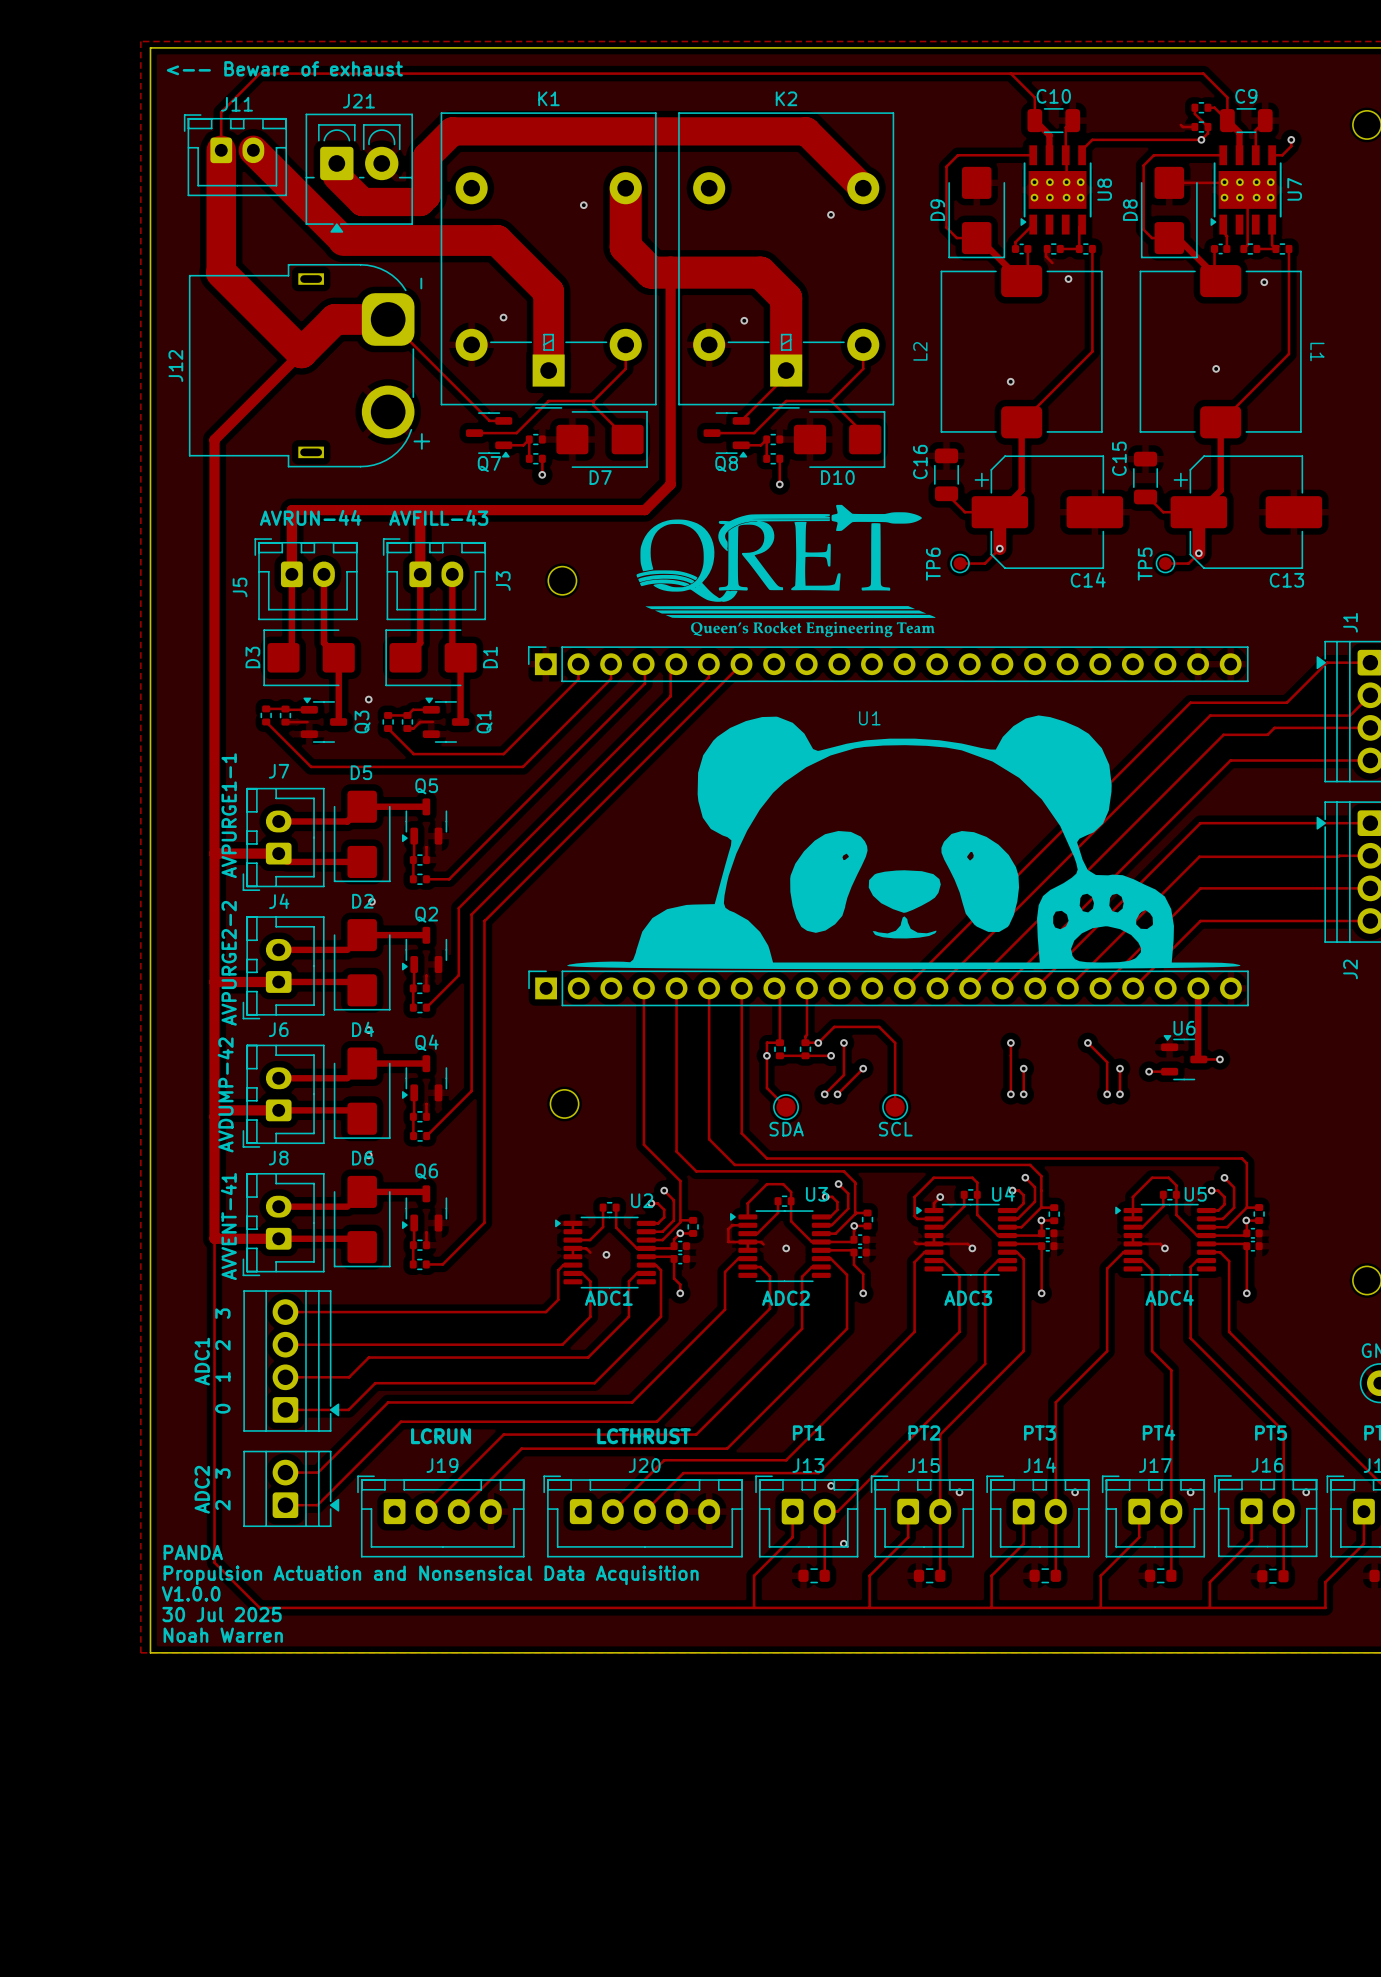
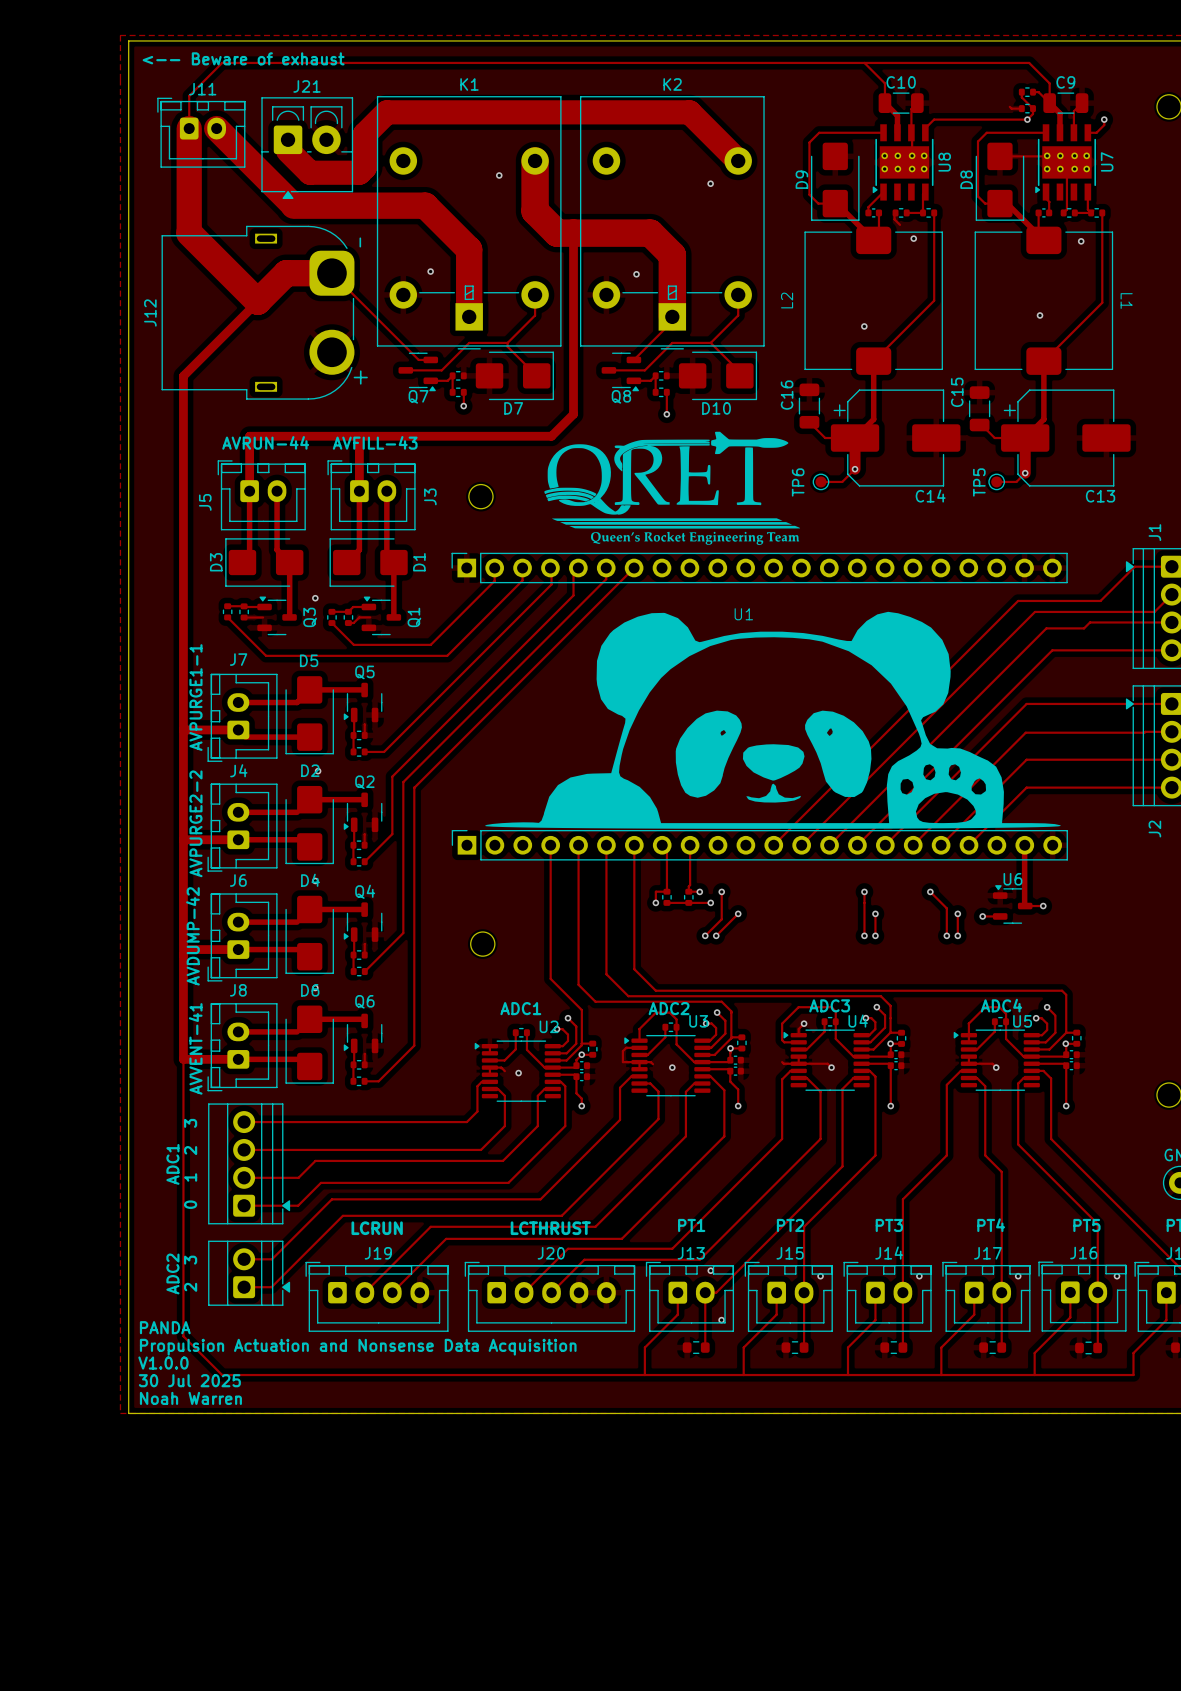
track: (818, 1042) (834, 1026) (879, 1026) (895, 1042) (895, 1107) -> none
track: (766, 1055) (766, 1088) (786, 1107) -> none
SDA: (786, 1107) -> none
SCL: (895, 1107) -> none
text position: ADC4 (1169, 1297) -> ADC4 (1001, 1005)
text position: ADC1 (608, 1298) -> ADC1 (520, 1008)
text position: ADC2 (785, 1298) -> ADC2 (669, 1008)
text position: ADC3 (968, 1298) -> ADC3 (829, 1005)
text: Propulsion Actuation and Nonsensical Data Acquisition (431, 1575) -> Propulsion Actuation and Nonsense Data Acquisition (358, 1347)

